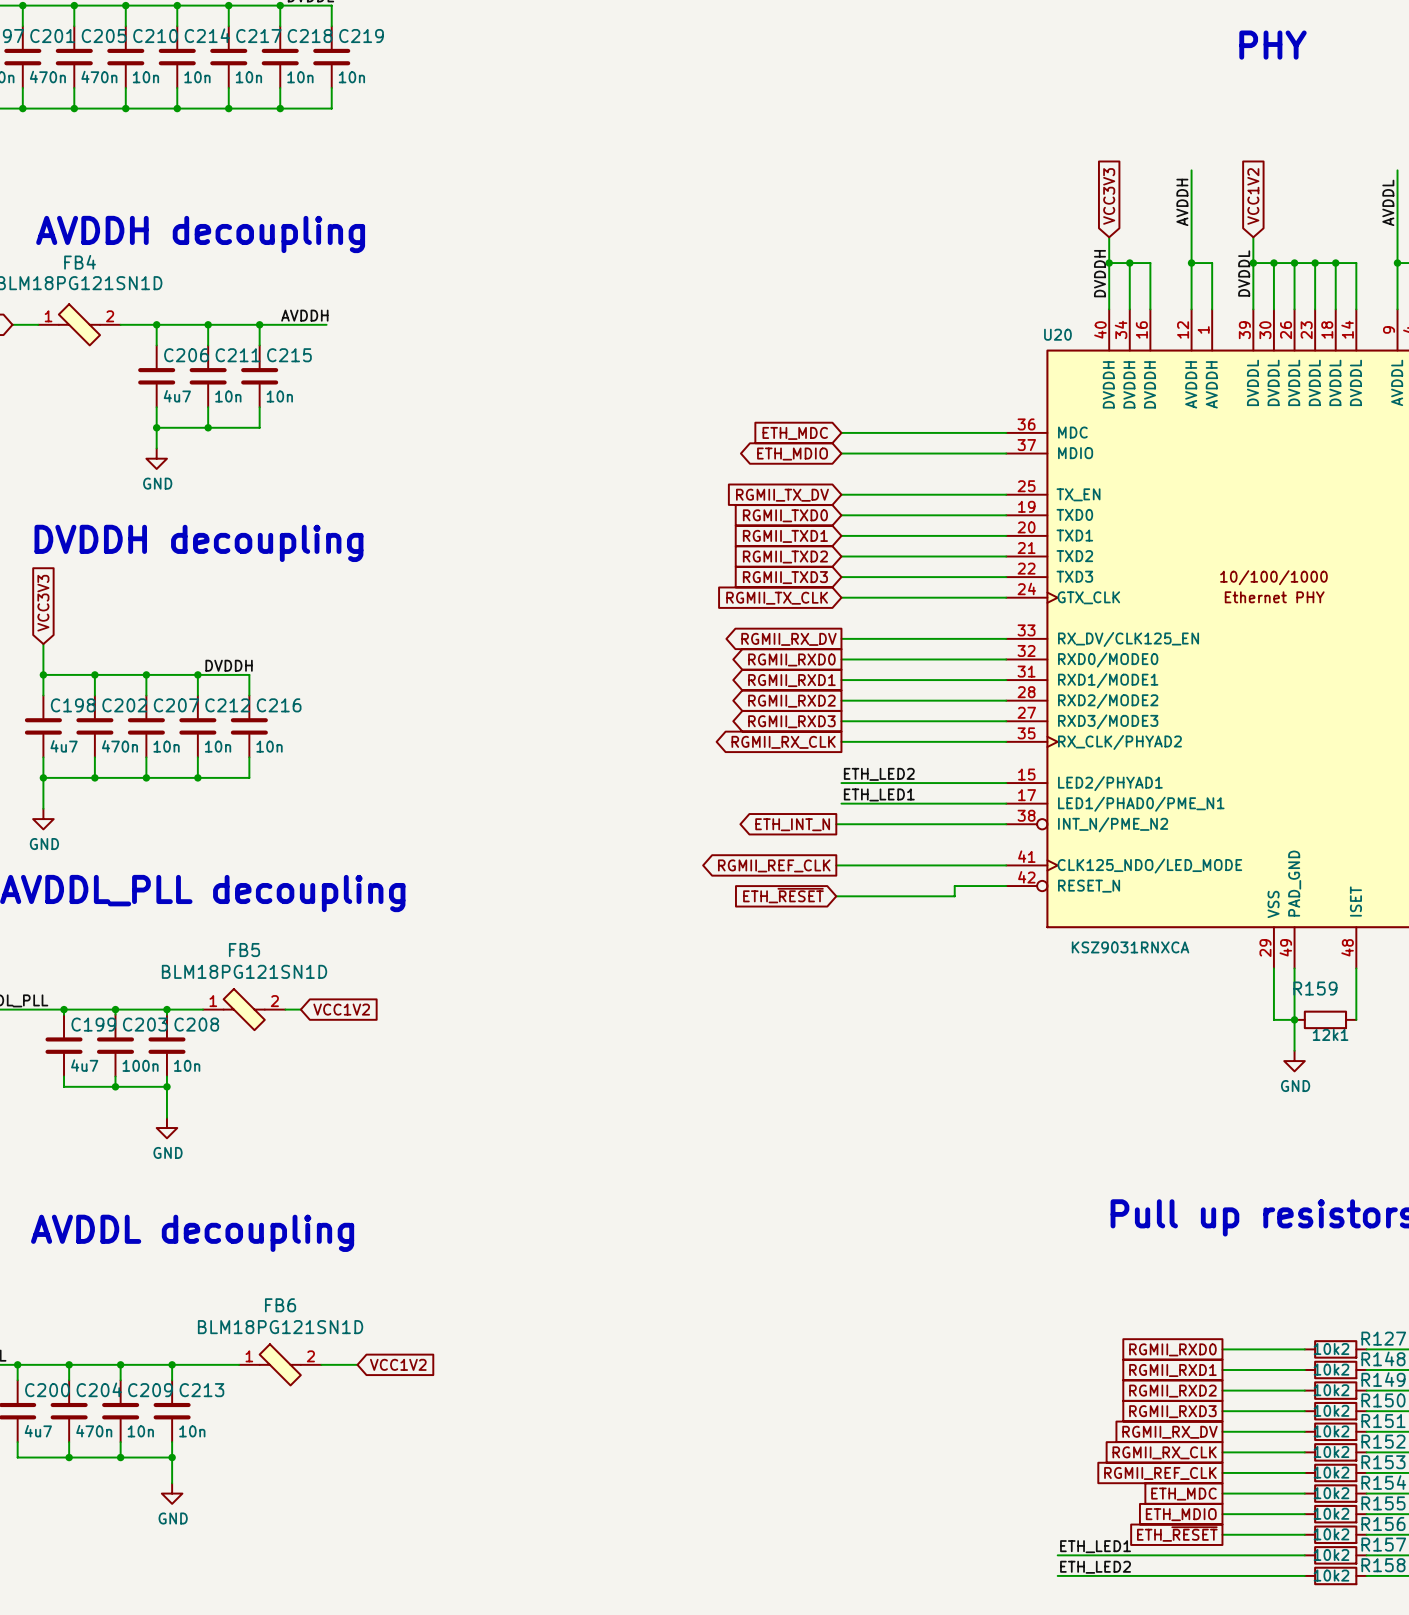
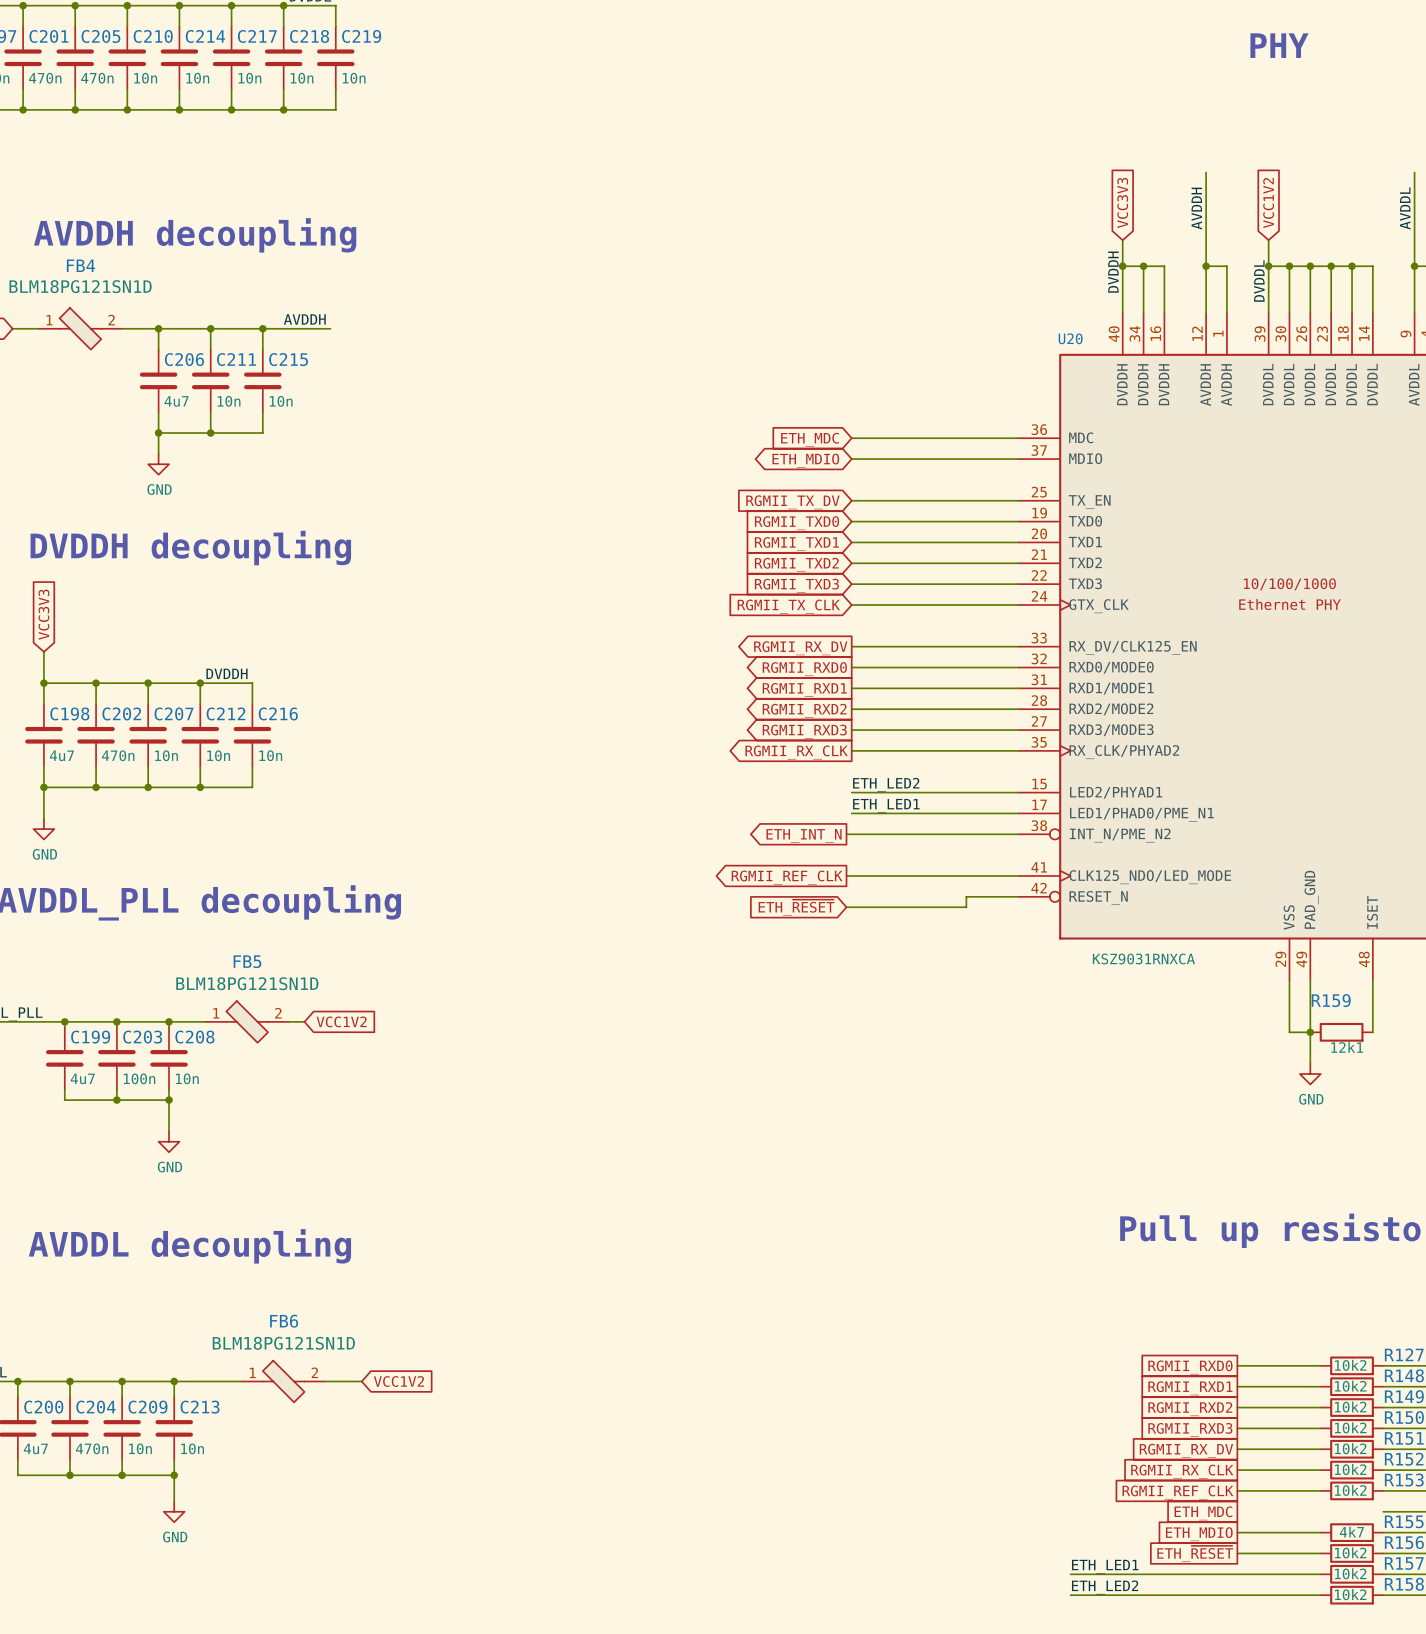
wire: (1222, 1493) (1304, 1493) -> none
R154: (1335, 1493) -> none
R155 text: 10k2 (1331, 1513) -> 4k7 (1351, 1532)

